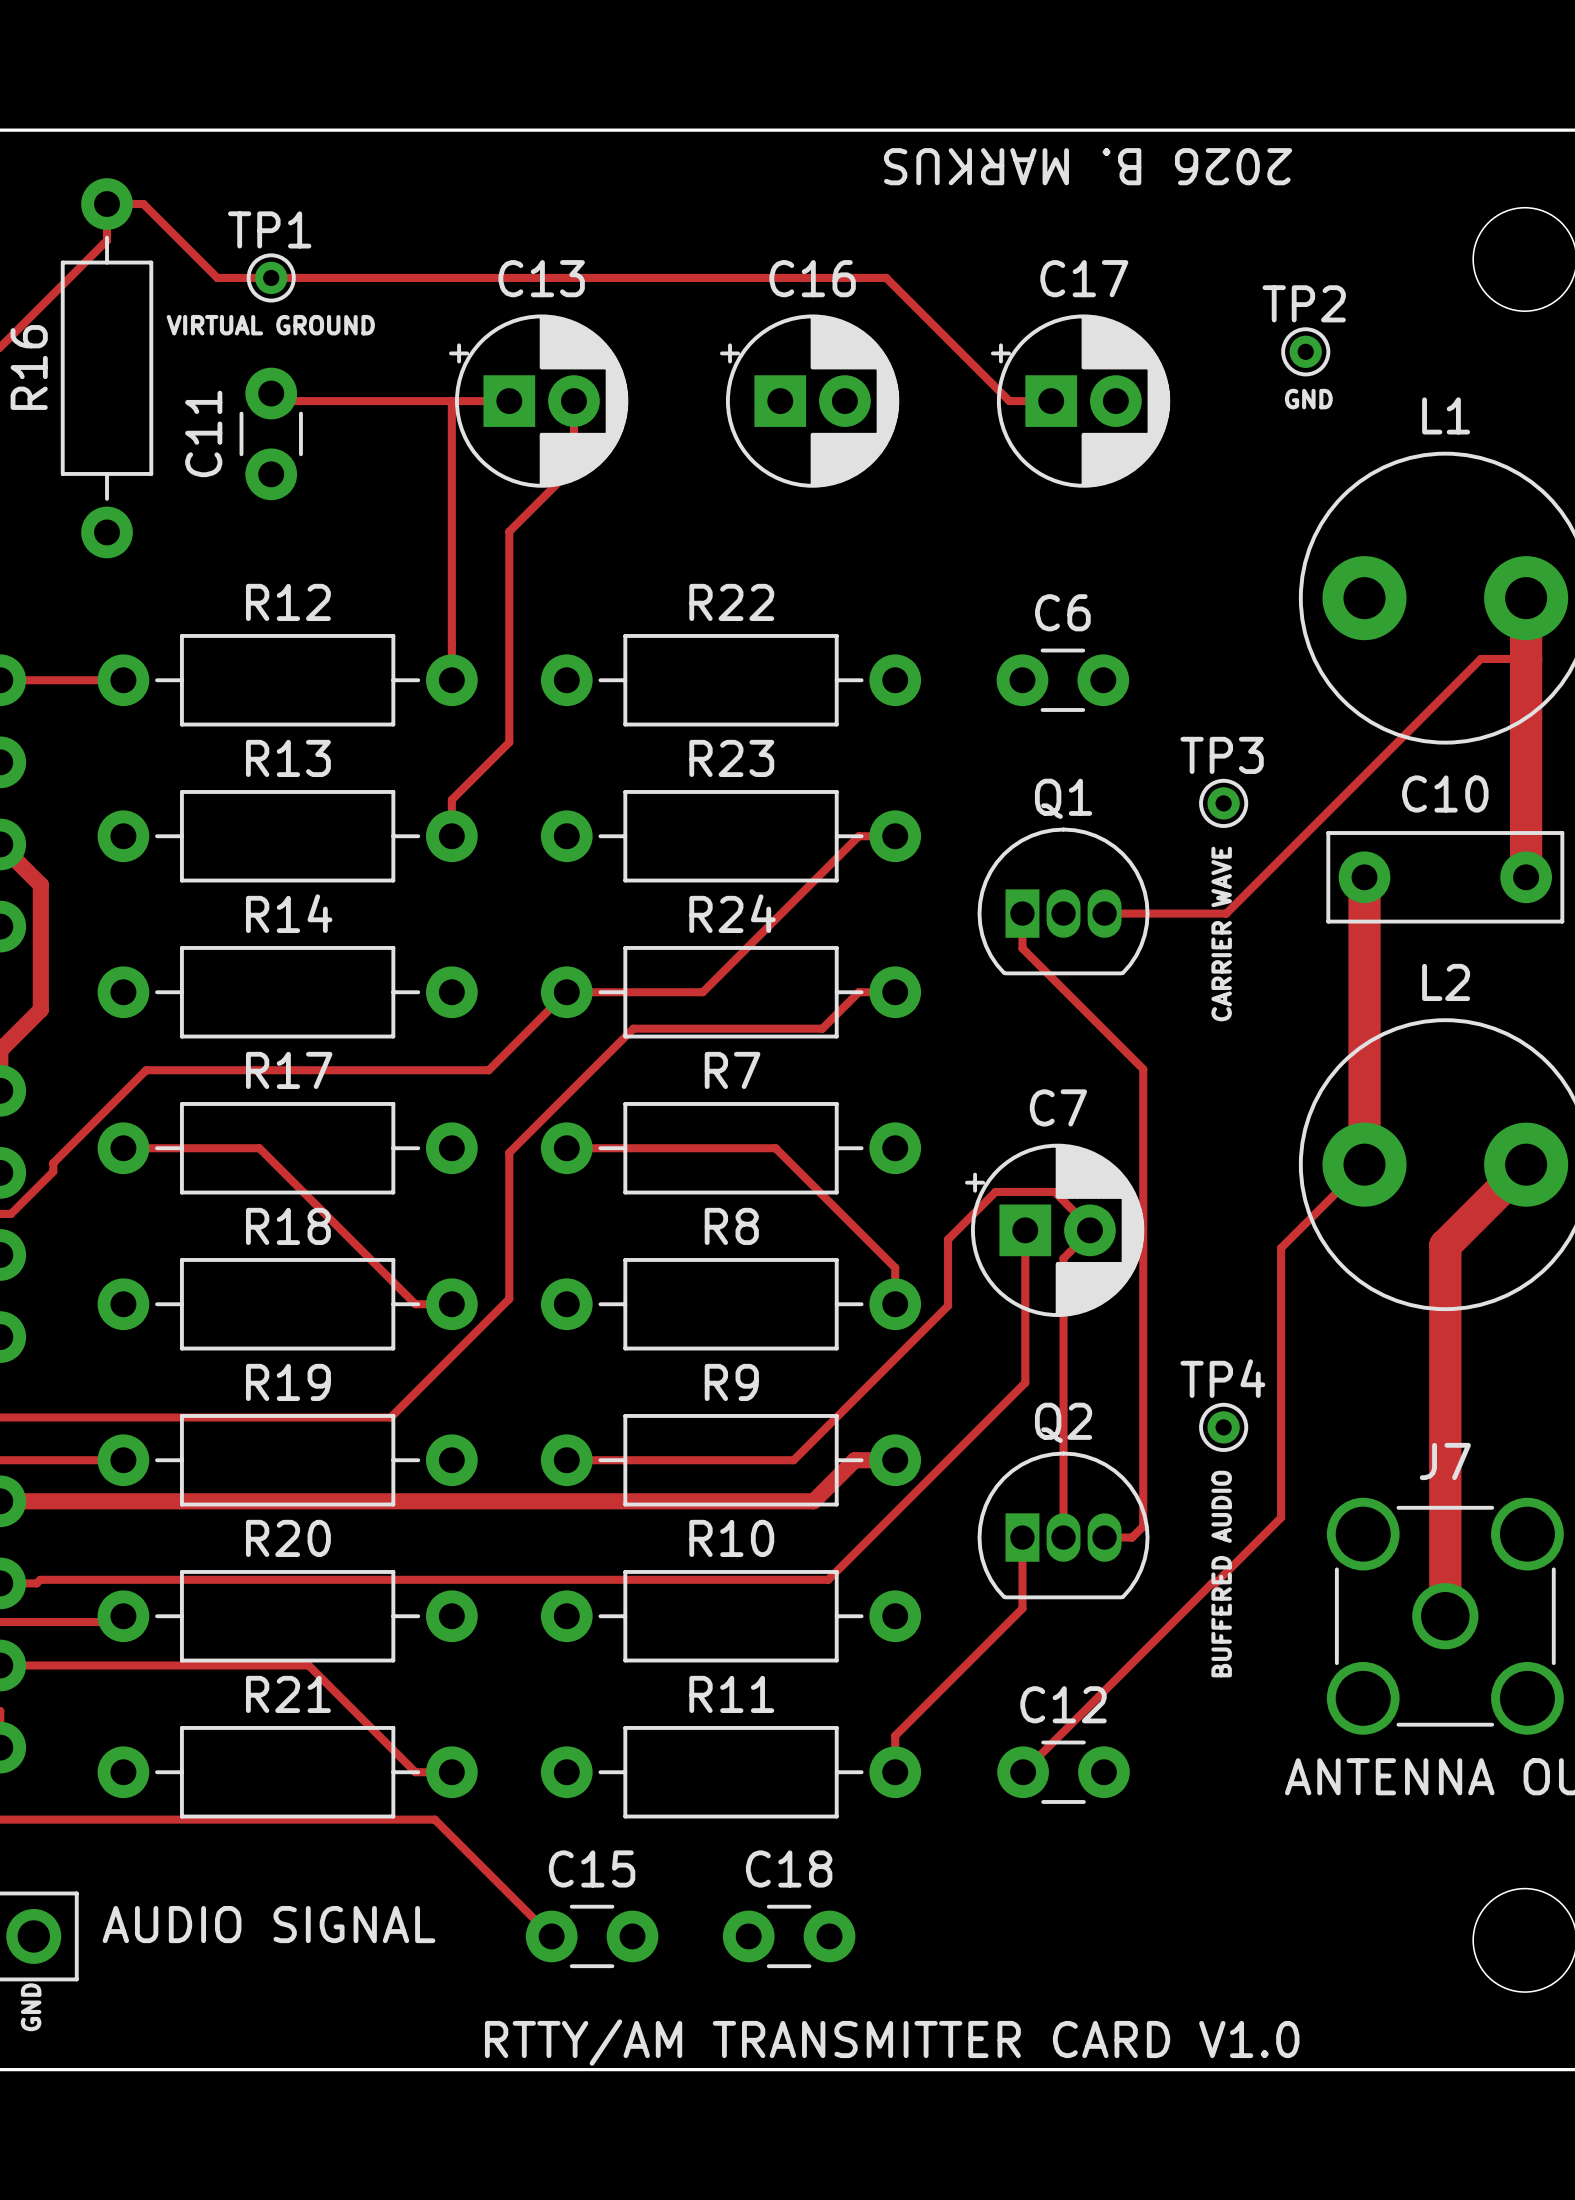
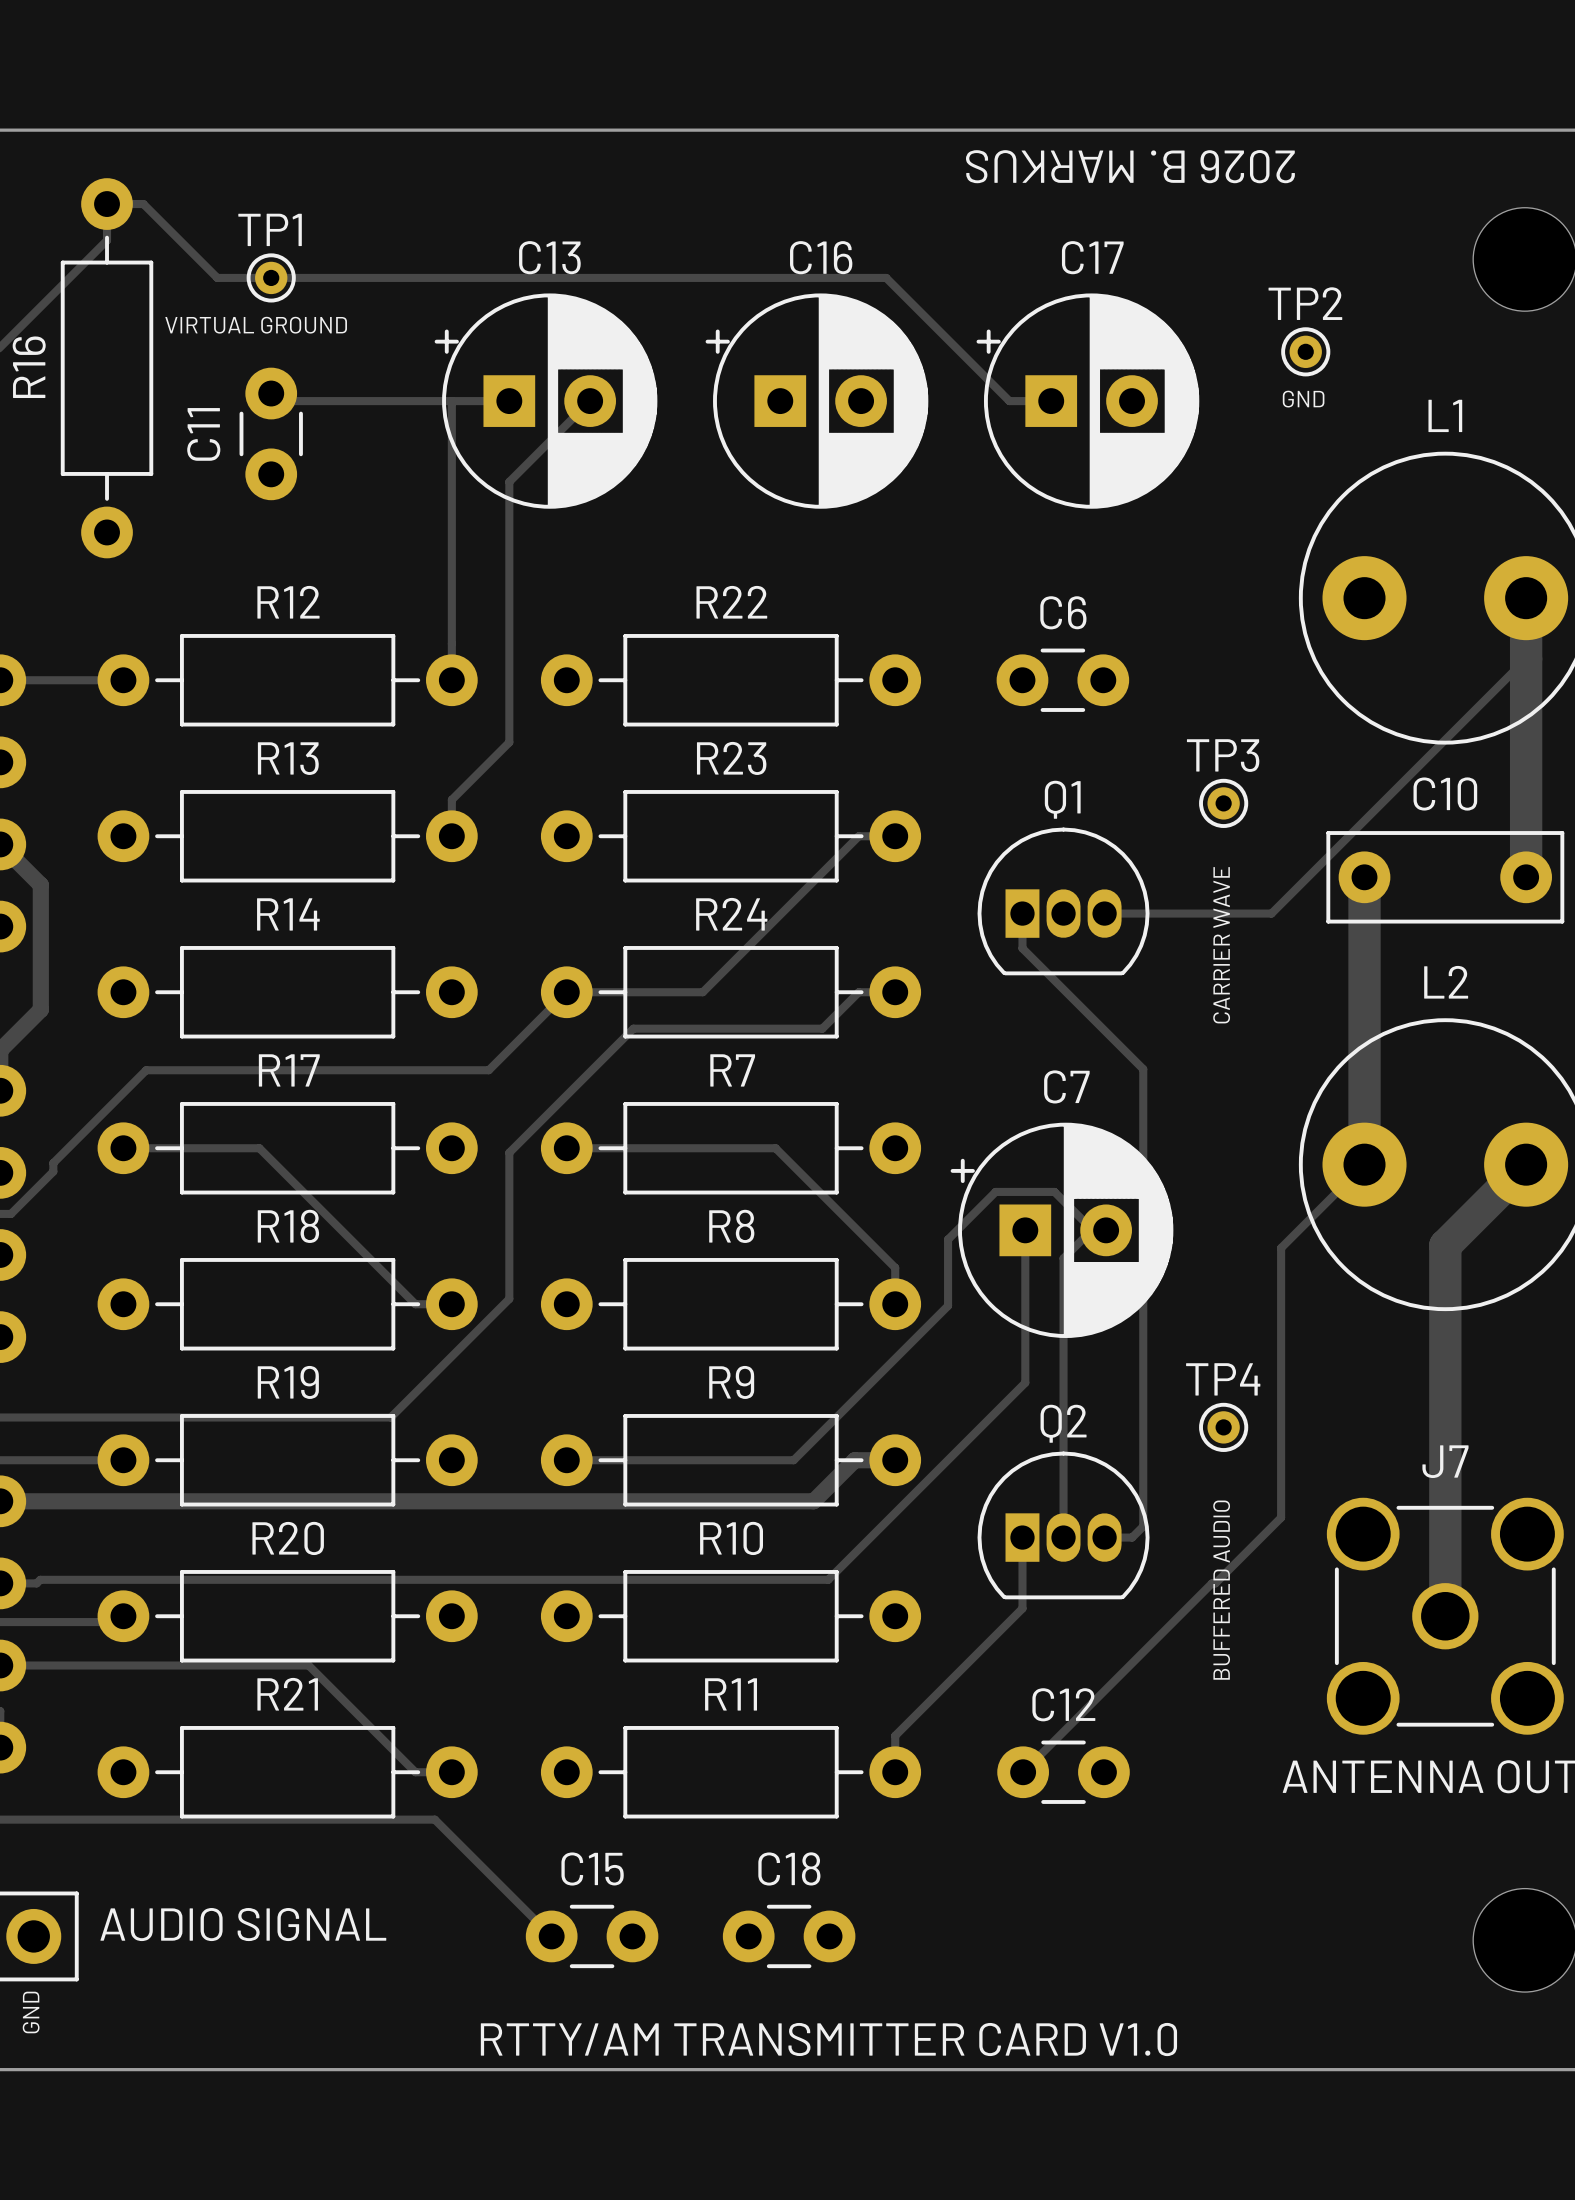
C13 footprint: [449, 314, 629, 488] -> [434, 293, 658, 509]
C16 footprint: [719, 314, 900, 488] -> [705, 293, 929, 509]
C17 footprint: [990, 314, 1171, 488] -> [976, 293, 1200, 509]
track: (573, 401) (573, 466) (509, 531) -> (590, 401) (509, 481) (509, 531)
track: (1526, 658) (1480, 658) (1226, 913) -> (1526, 658) (1271, 913) (1226, 913)
C7 footprint: [965, 1143, 1145, 1317] -> [950, 1122, 1174, 1338]

